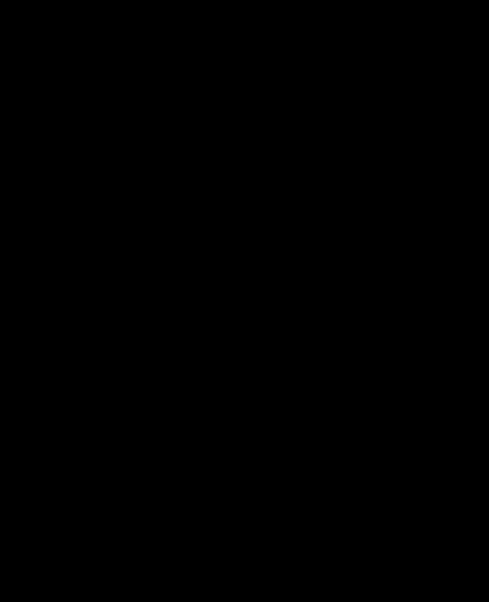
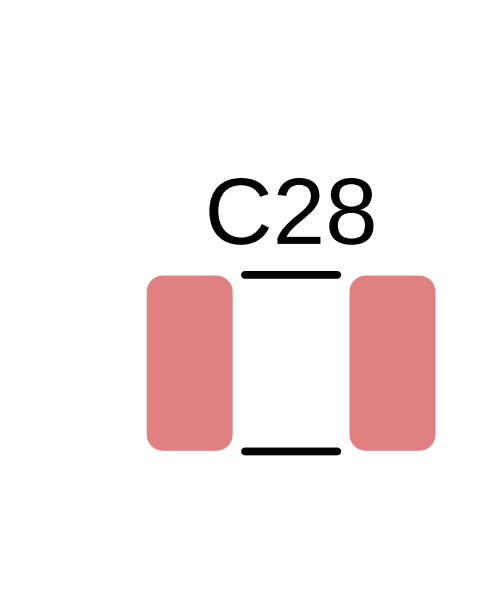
C28: none -> (291, 363)

